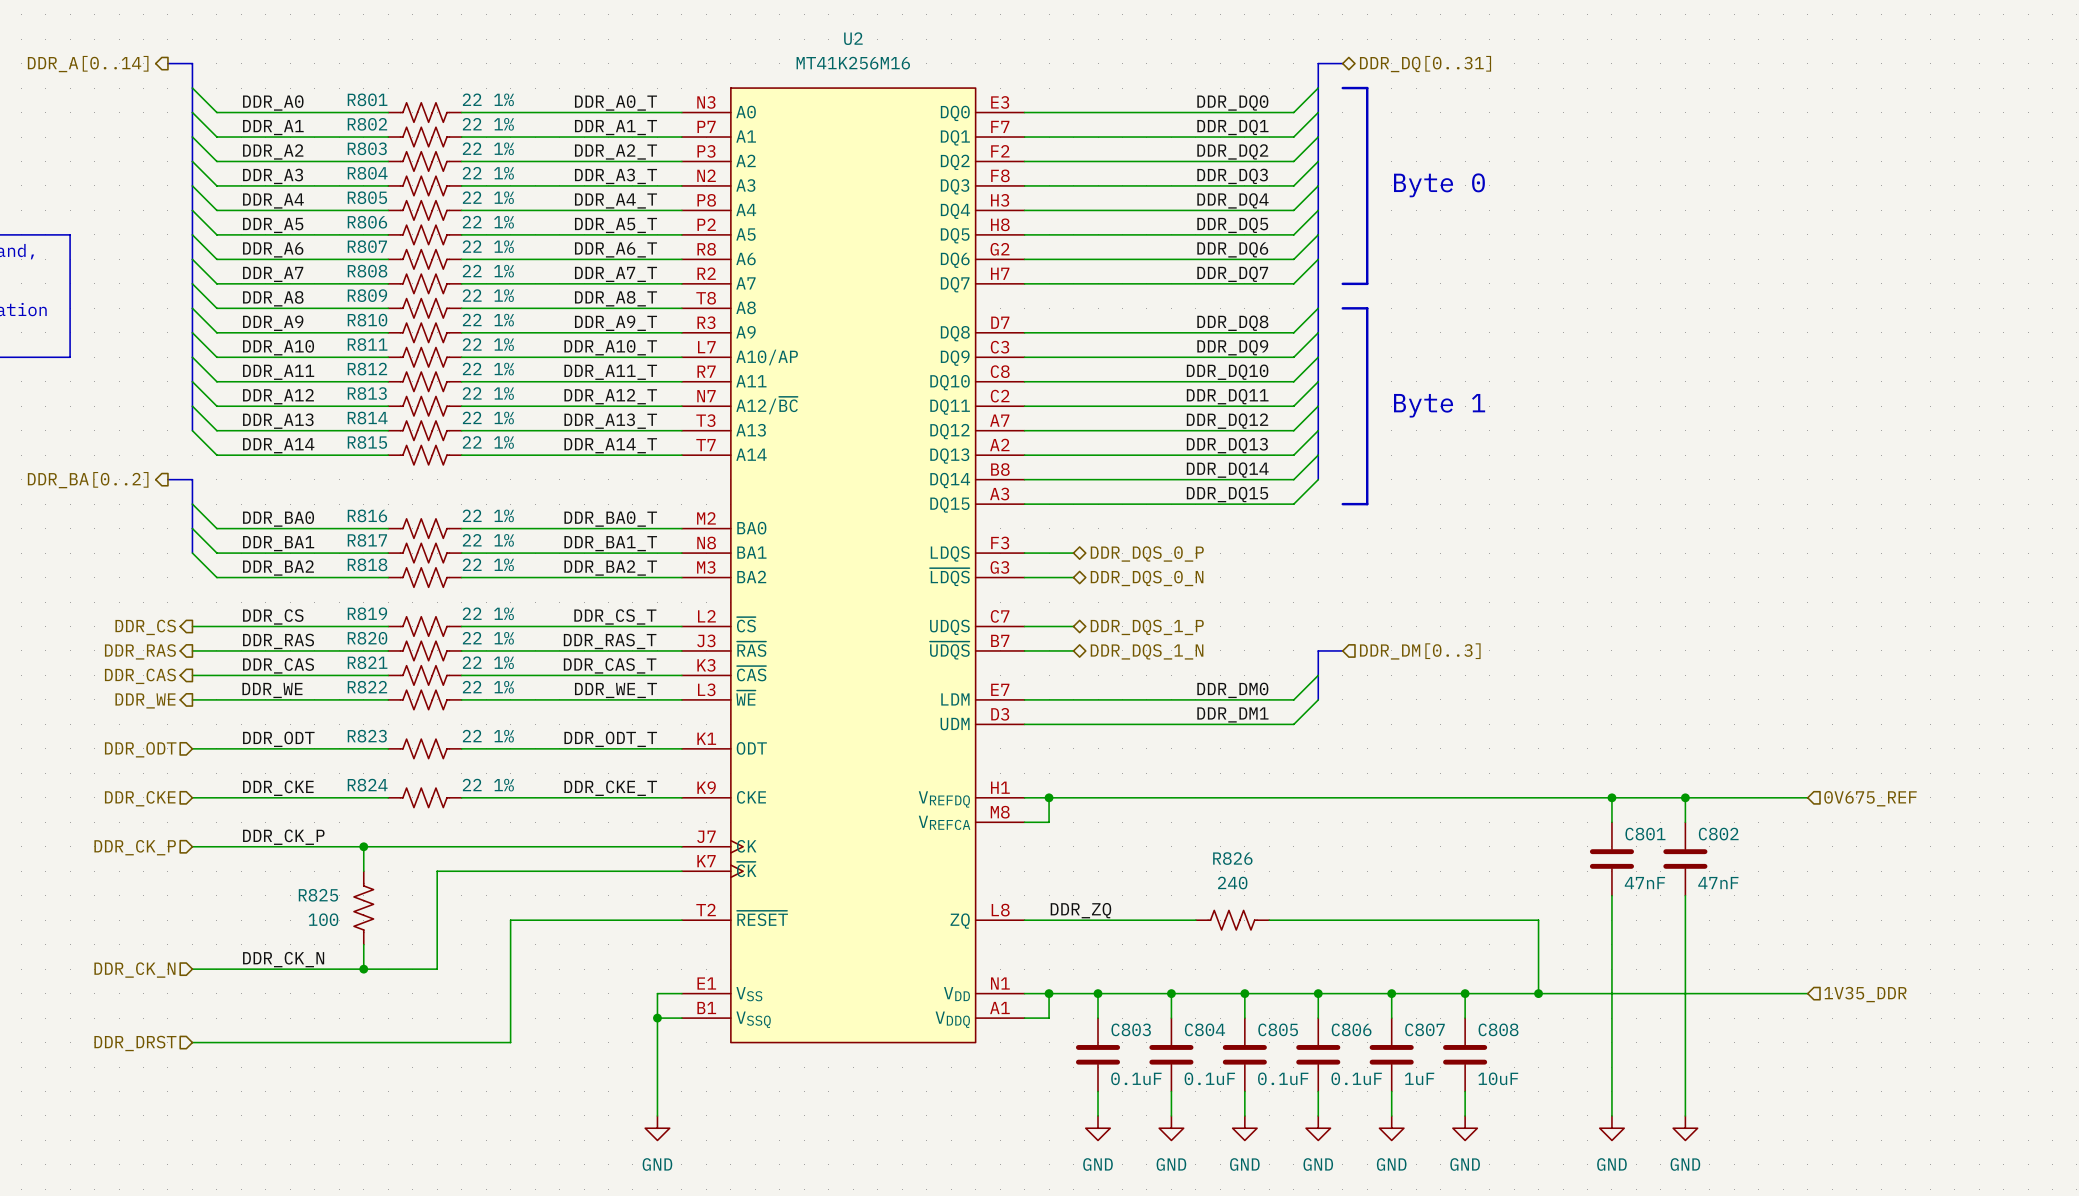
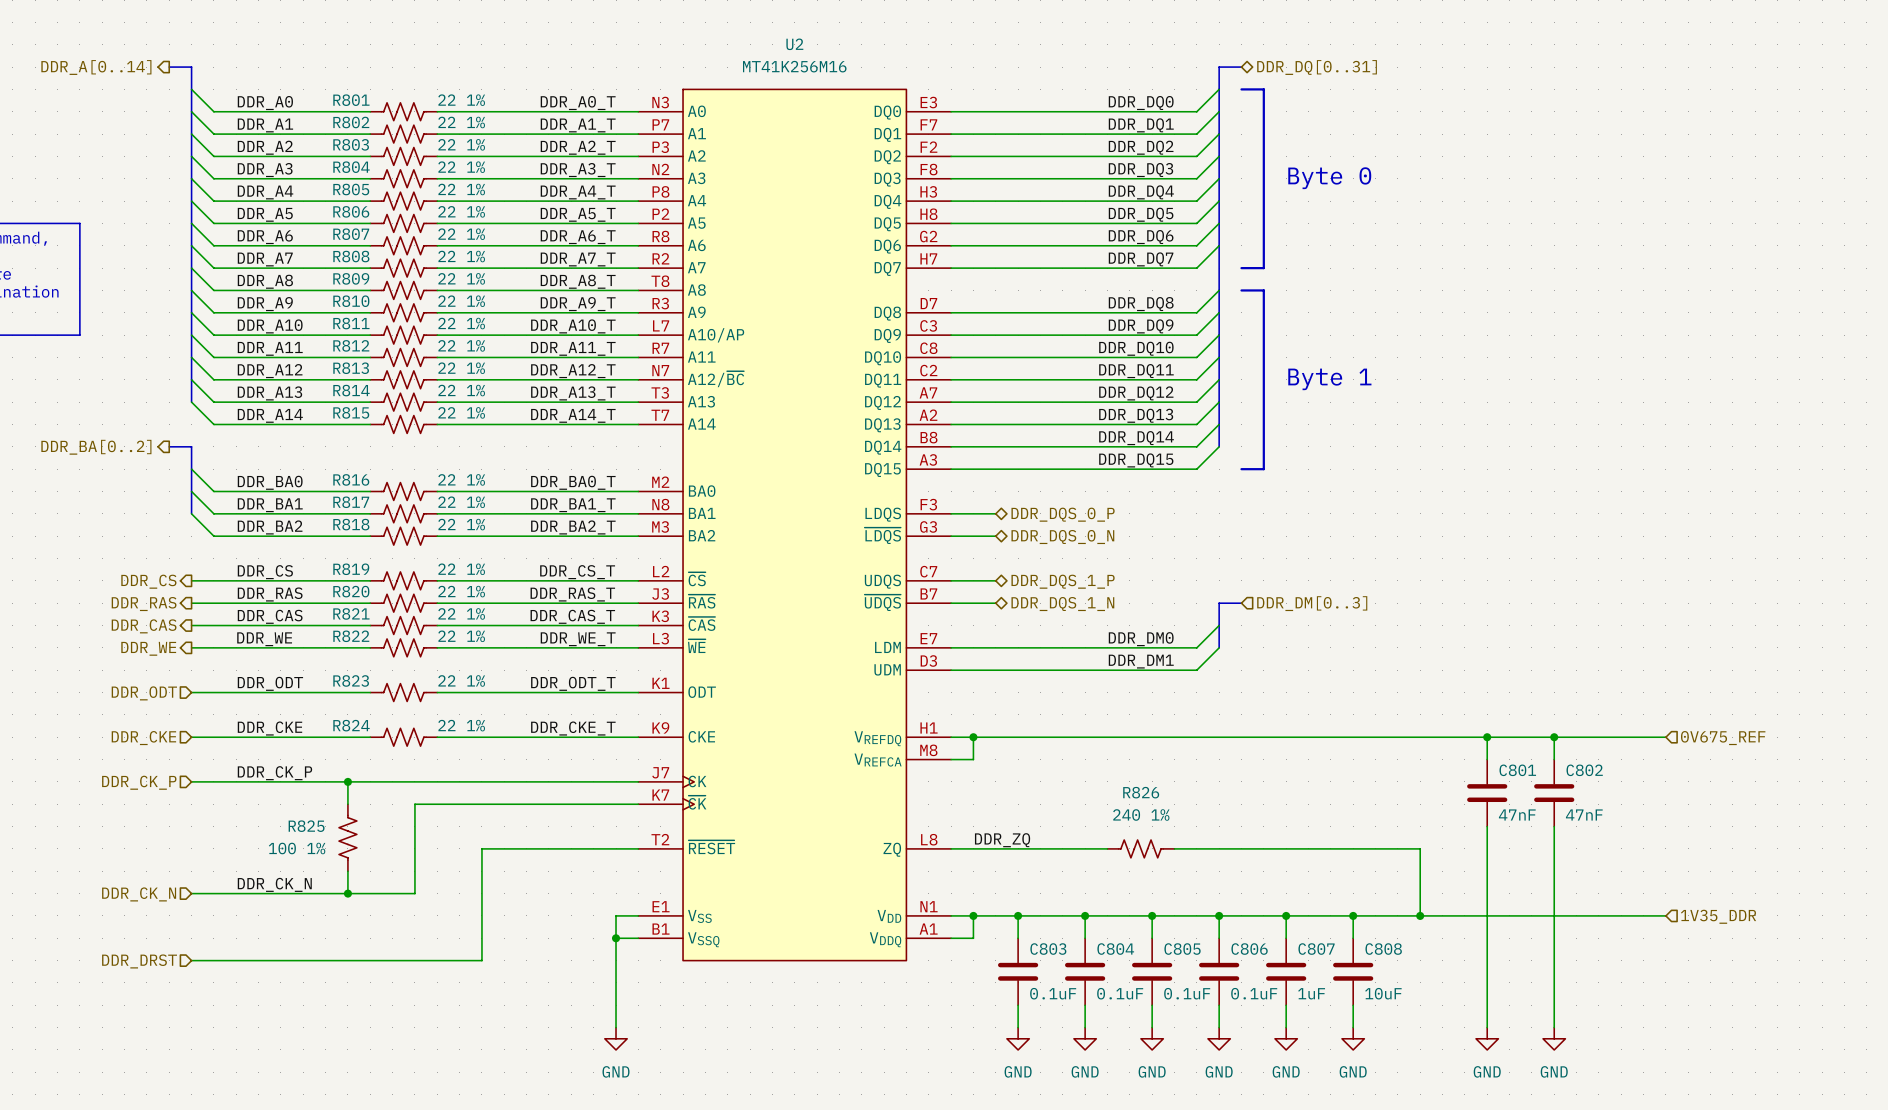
R826 value: 240 (1232, 883) -> 240 1% (1141, 814)
R825 value: 100 (323, 919) -> 100 1% (297, 848)

